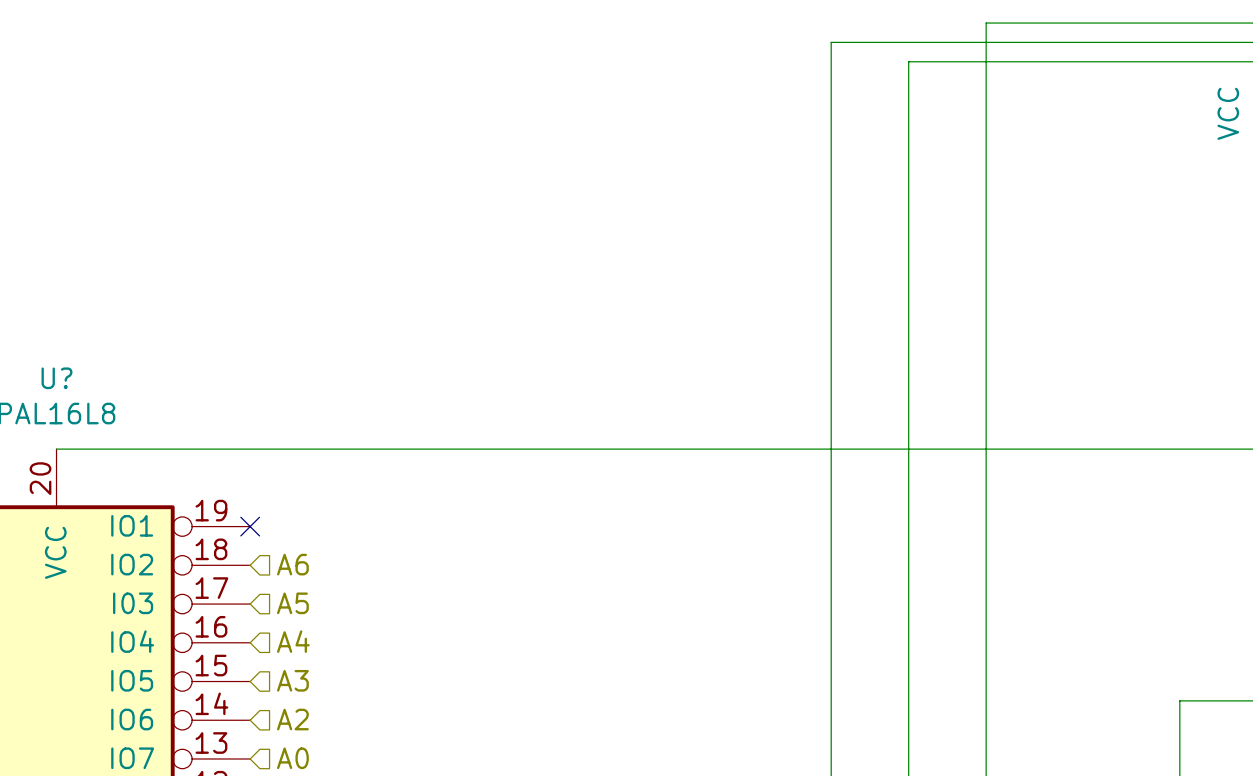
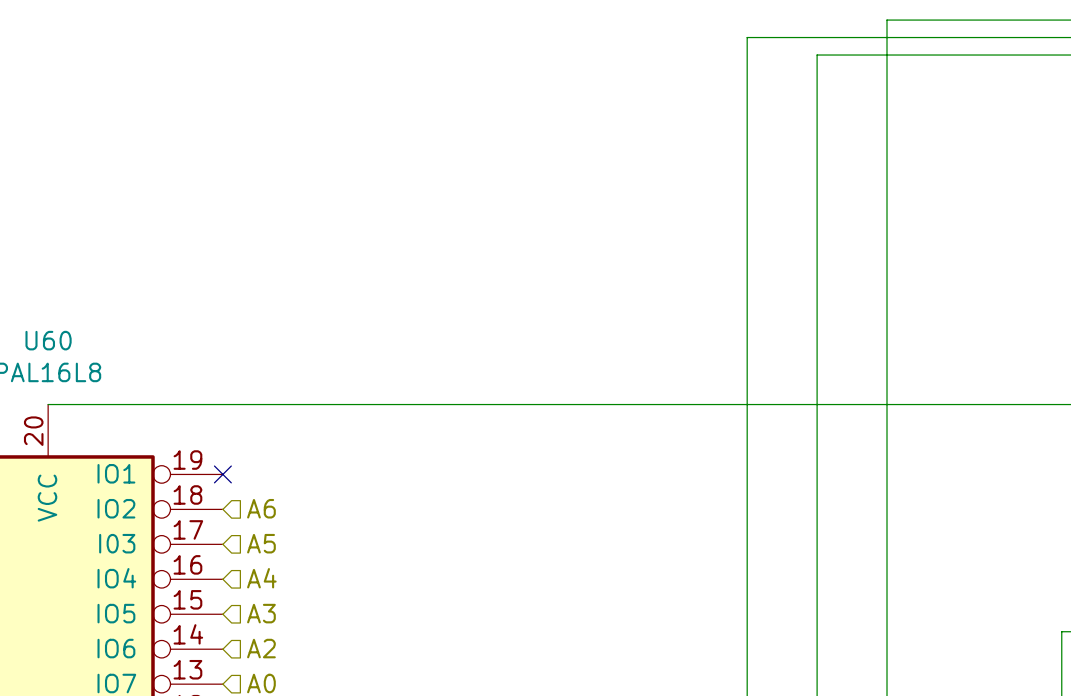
U? name: U? (56, 378) -> U60 (48, 340)

